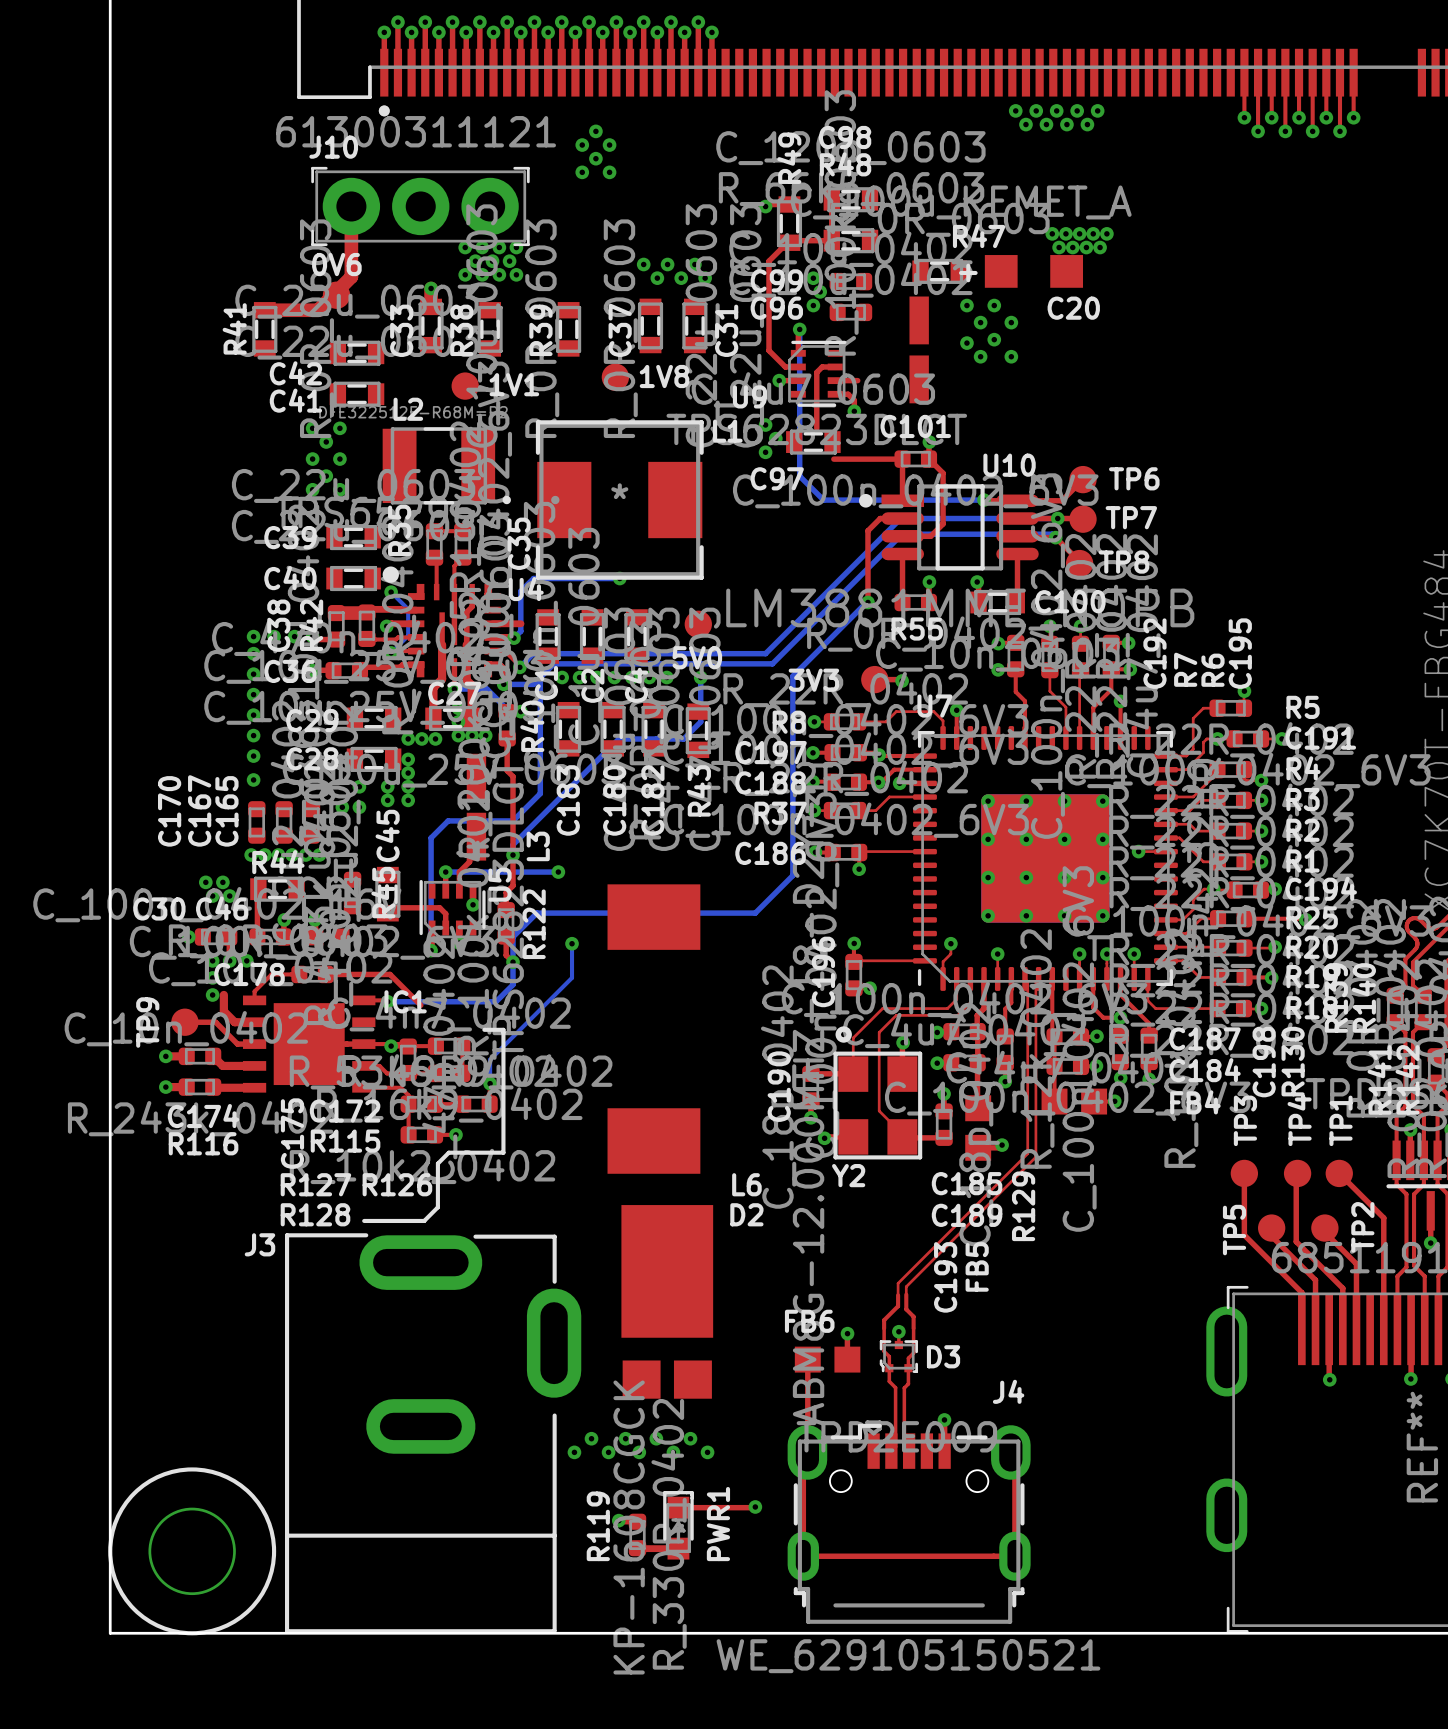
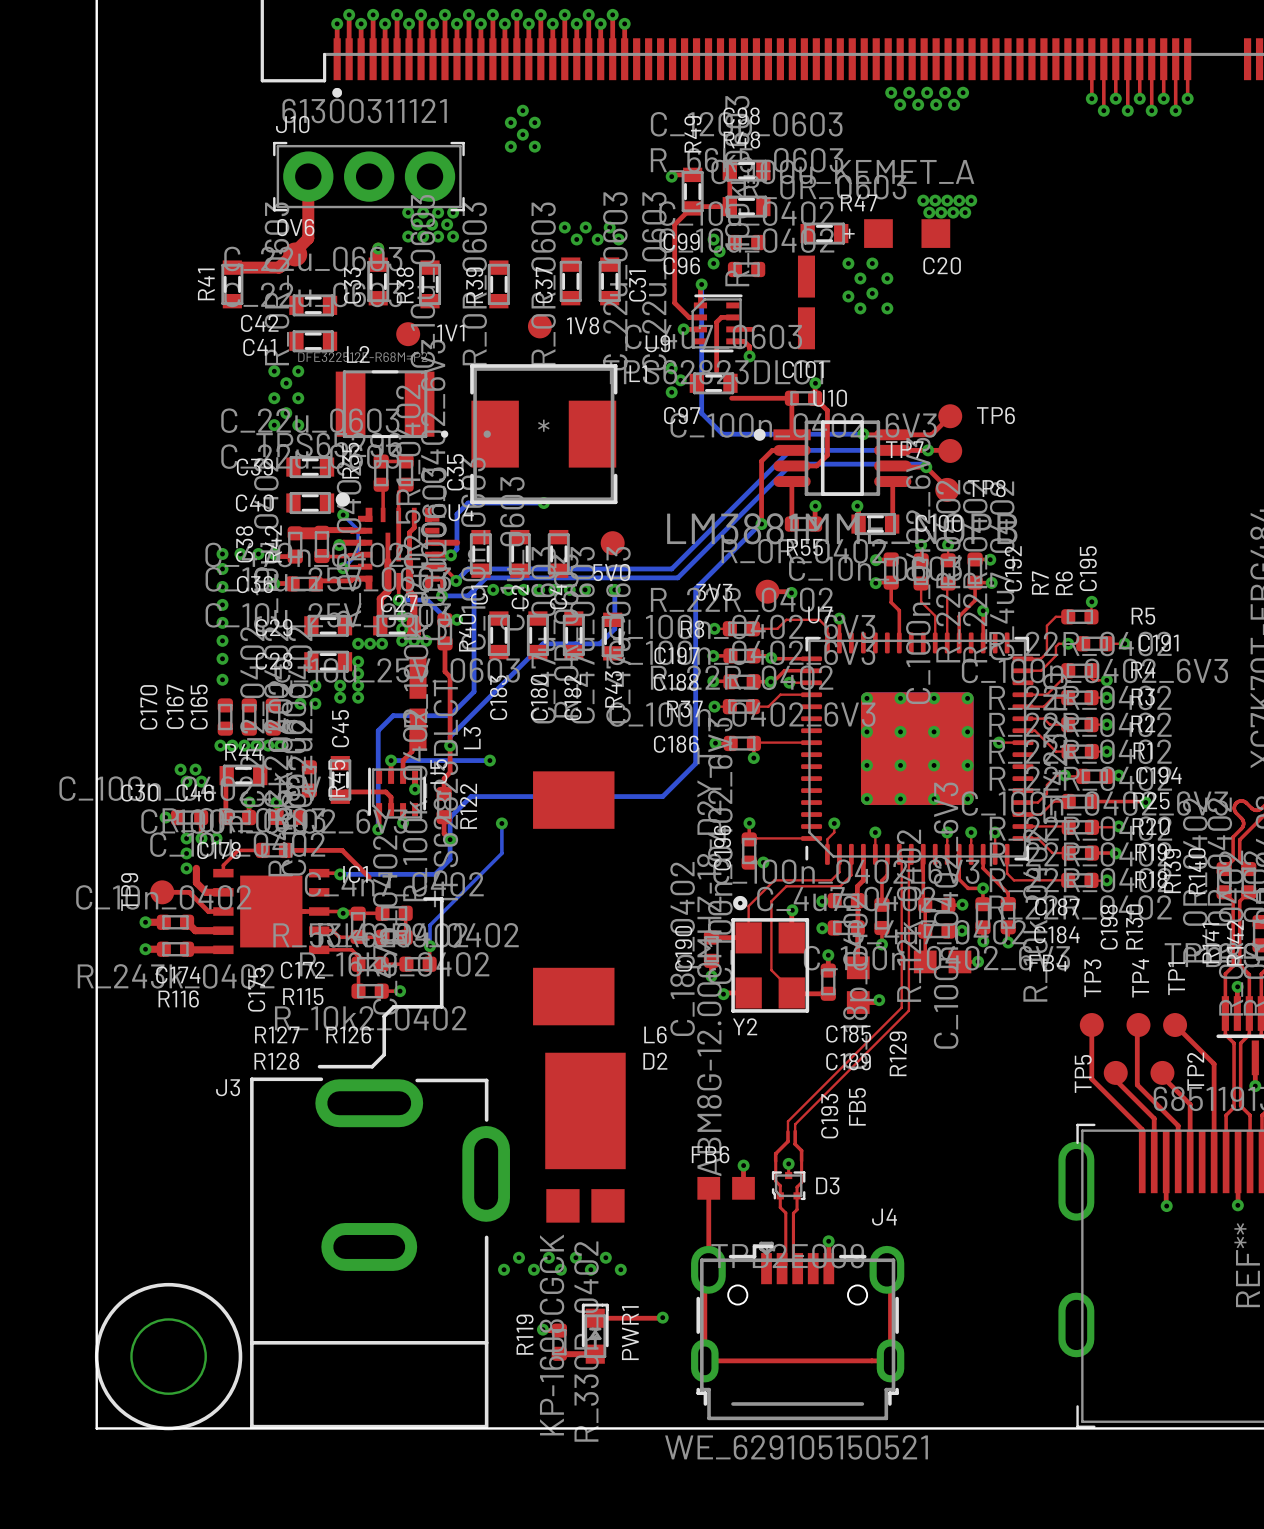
U10 name position: U10 (1009, 465) -> U10 (830, 398)
TP7 name position: TP7 (1131, 517) -> TP7 (904, 449)

